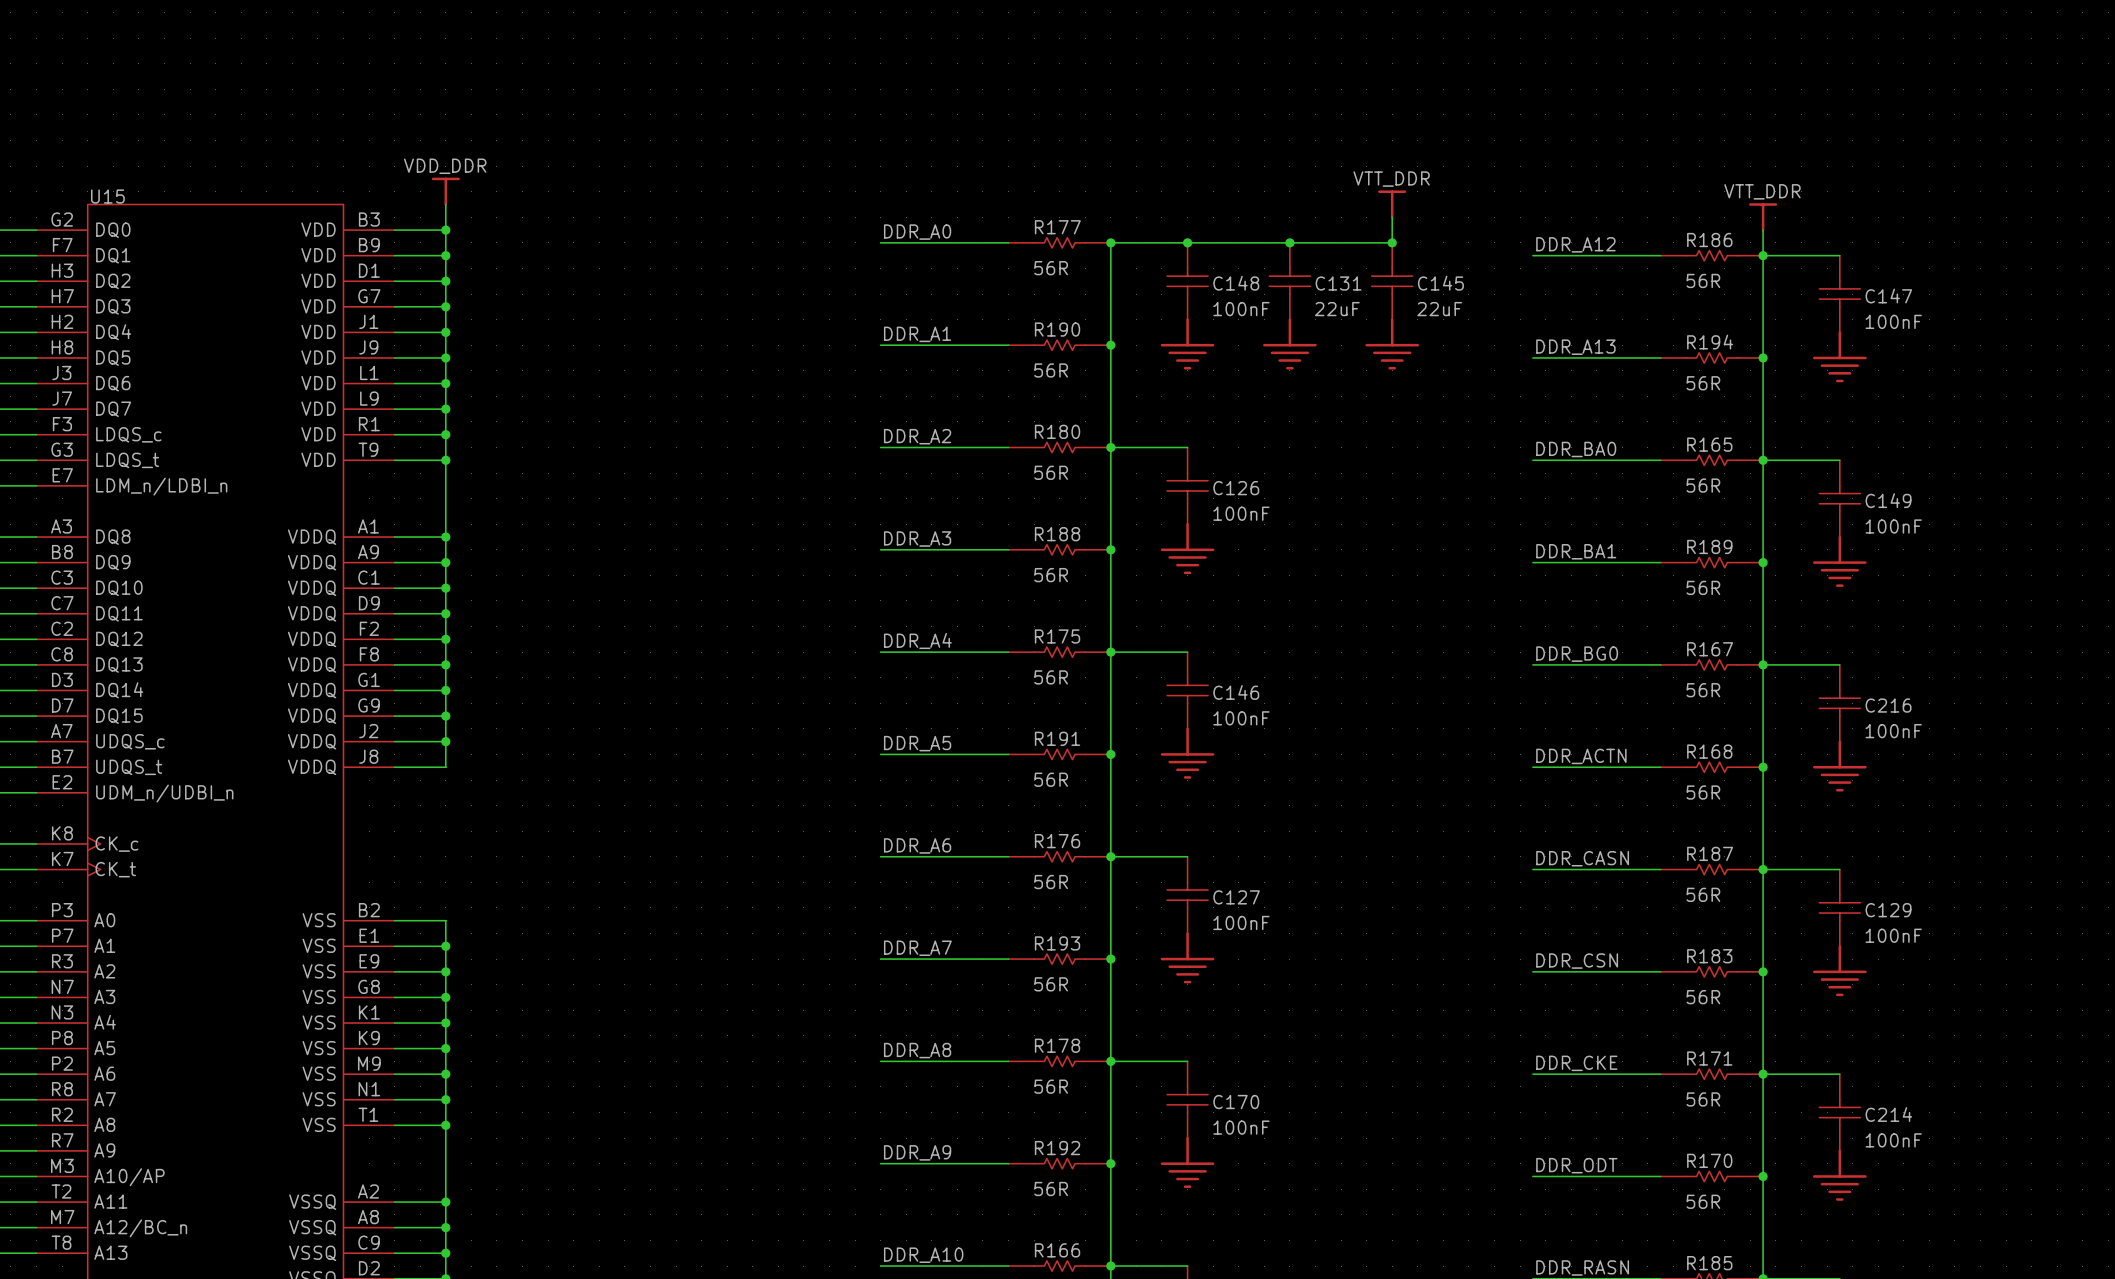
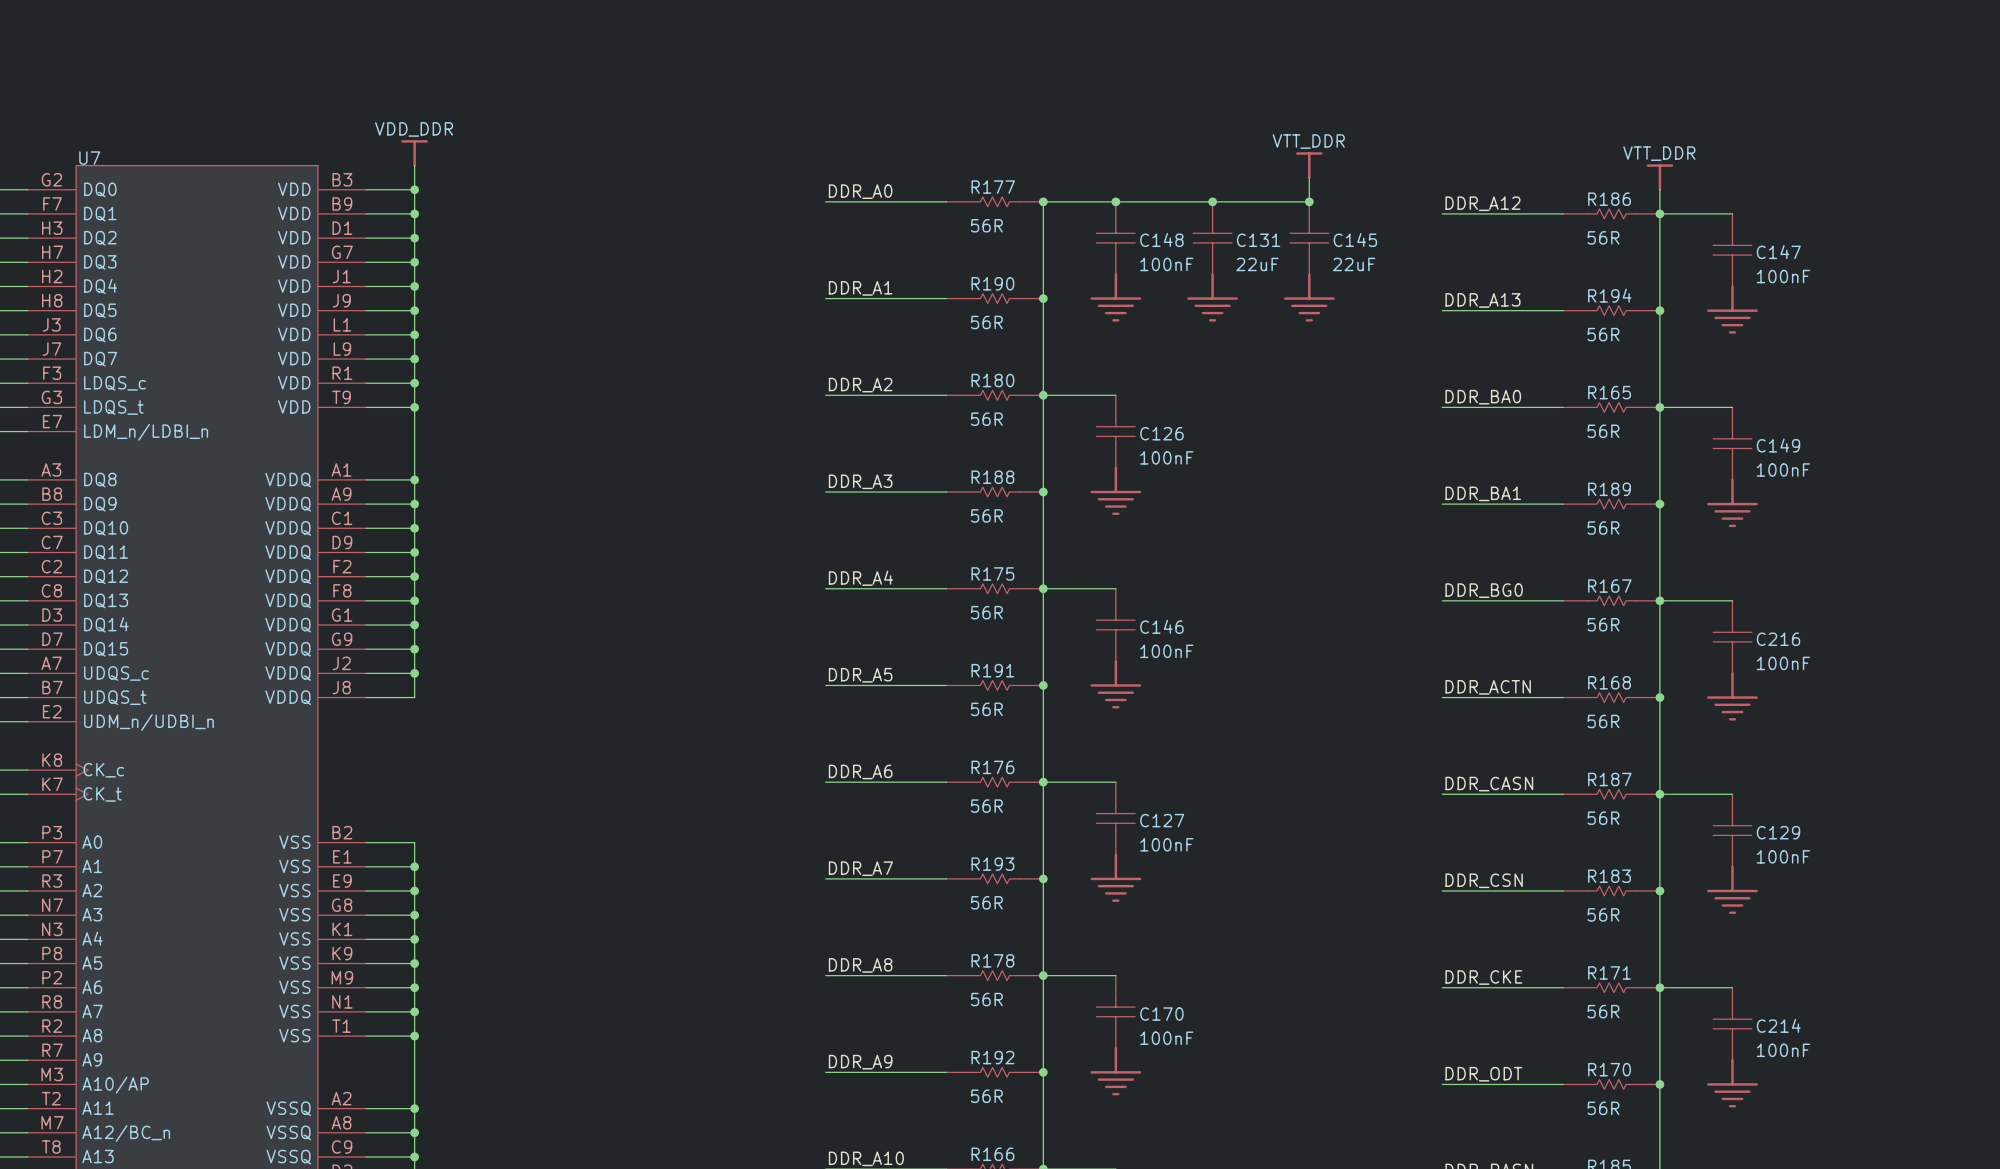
U15 name: U15 (107, 196) -> U7 (89, 158)

